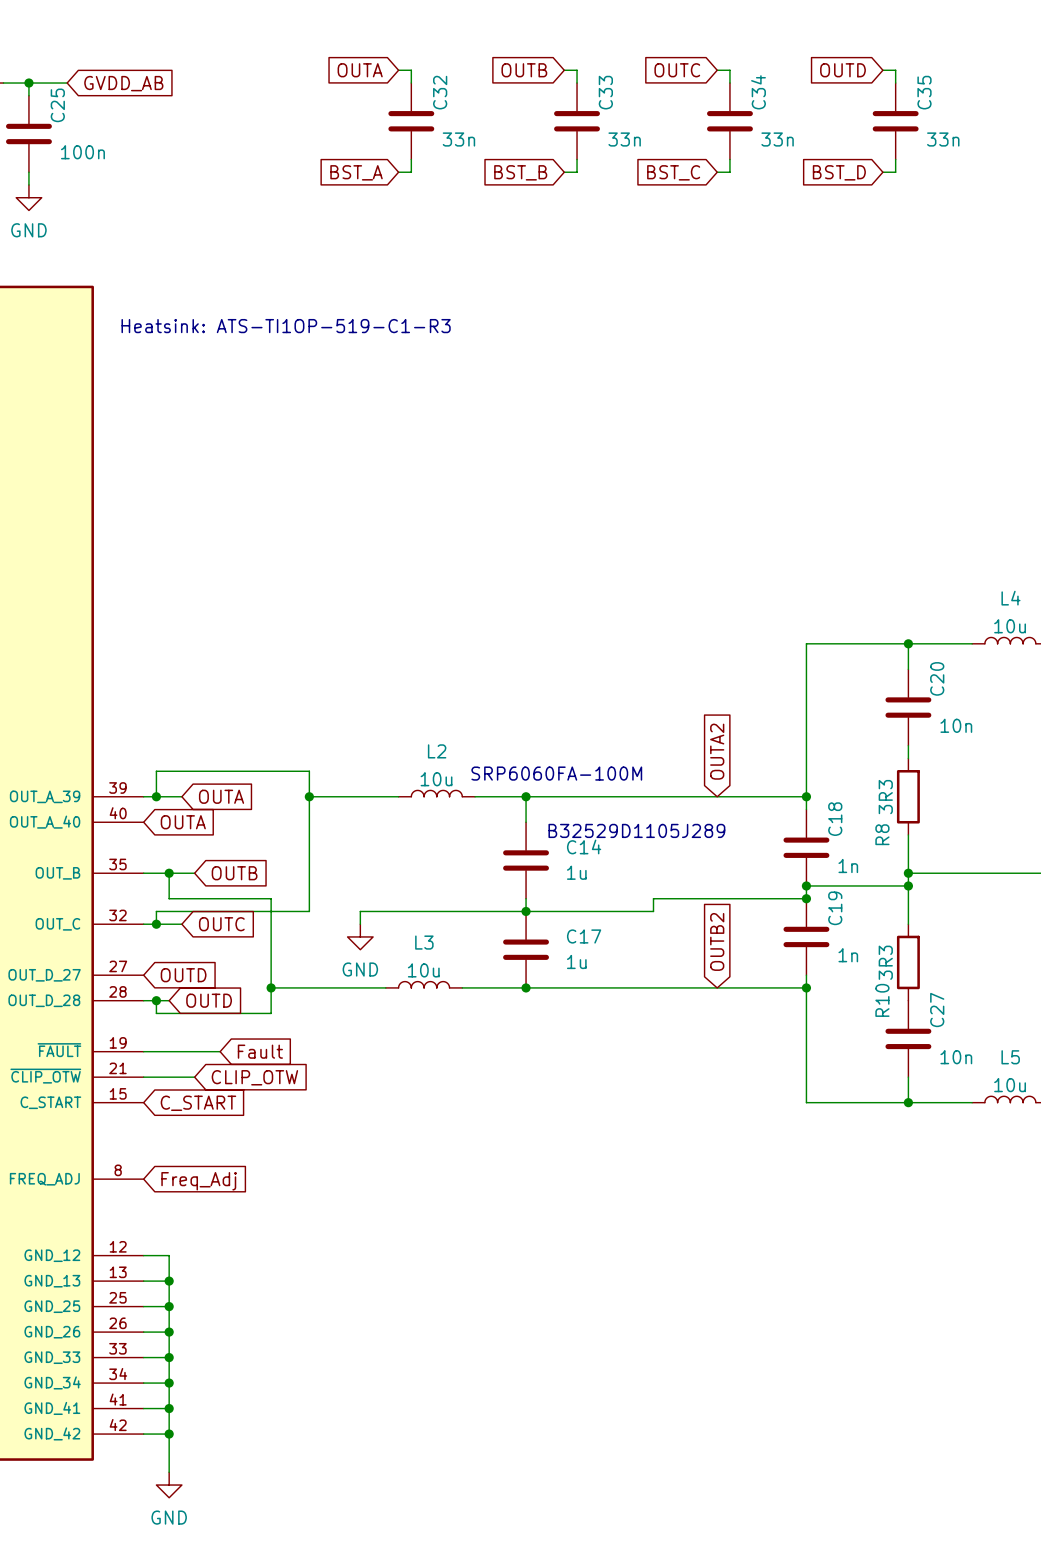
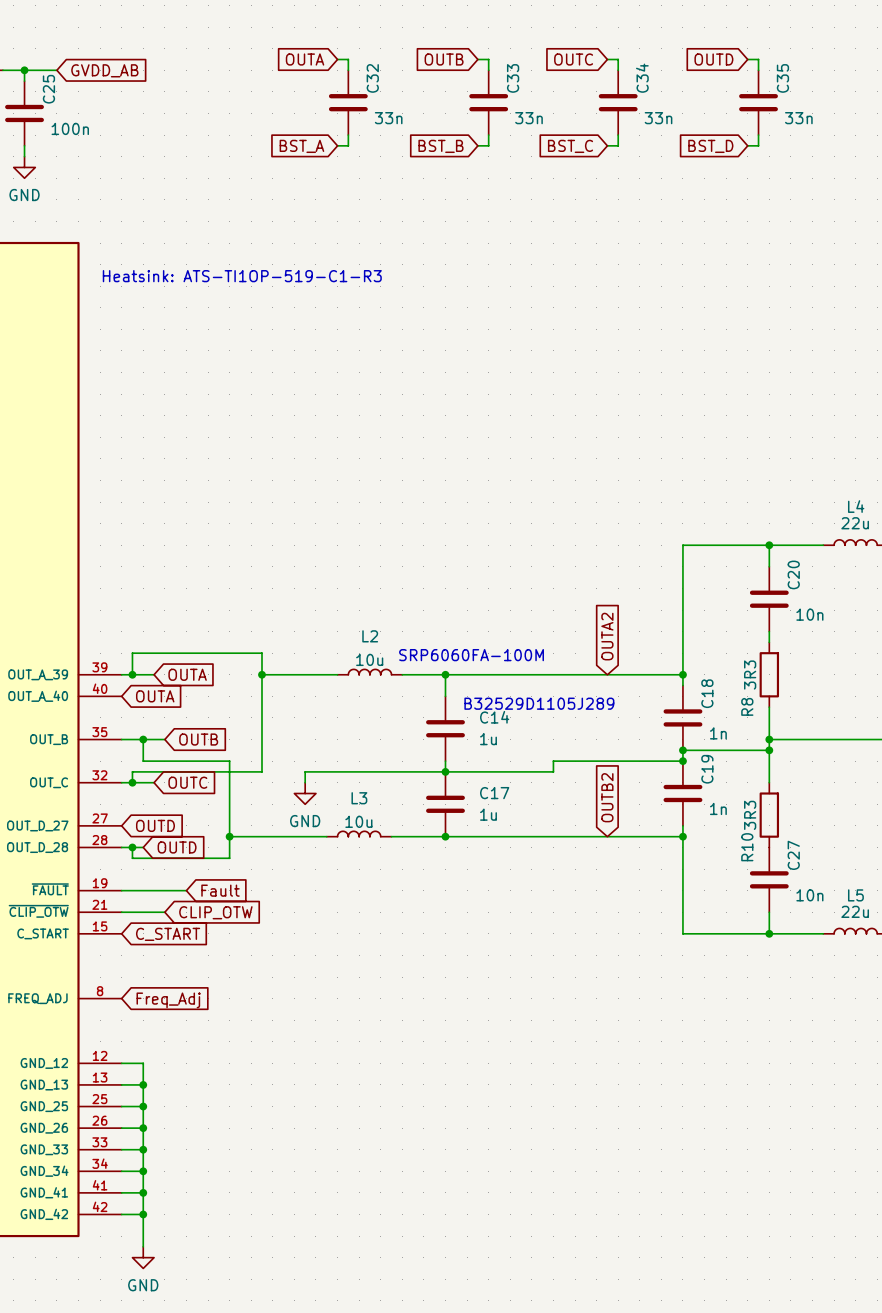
L4 value: 10u (1010, 626) -> 22u (855, 523)
L5 value: 10u (1010, 1085) -> 22u (855, 911)

